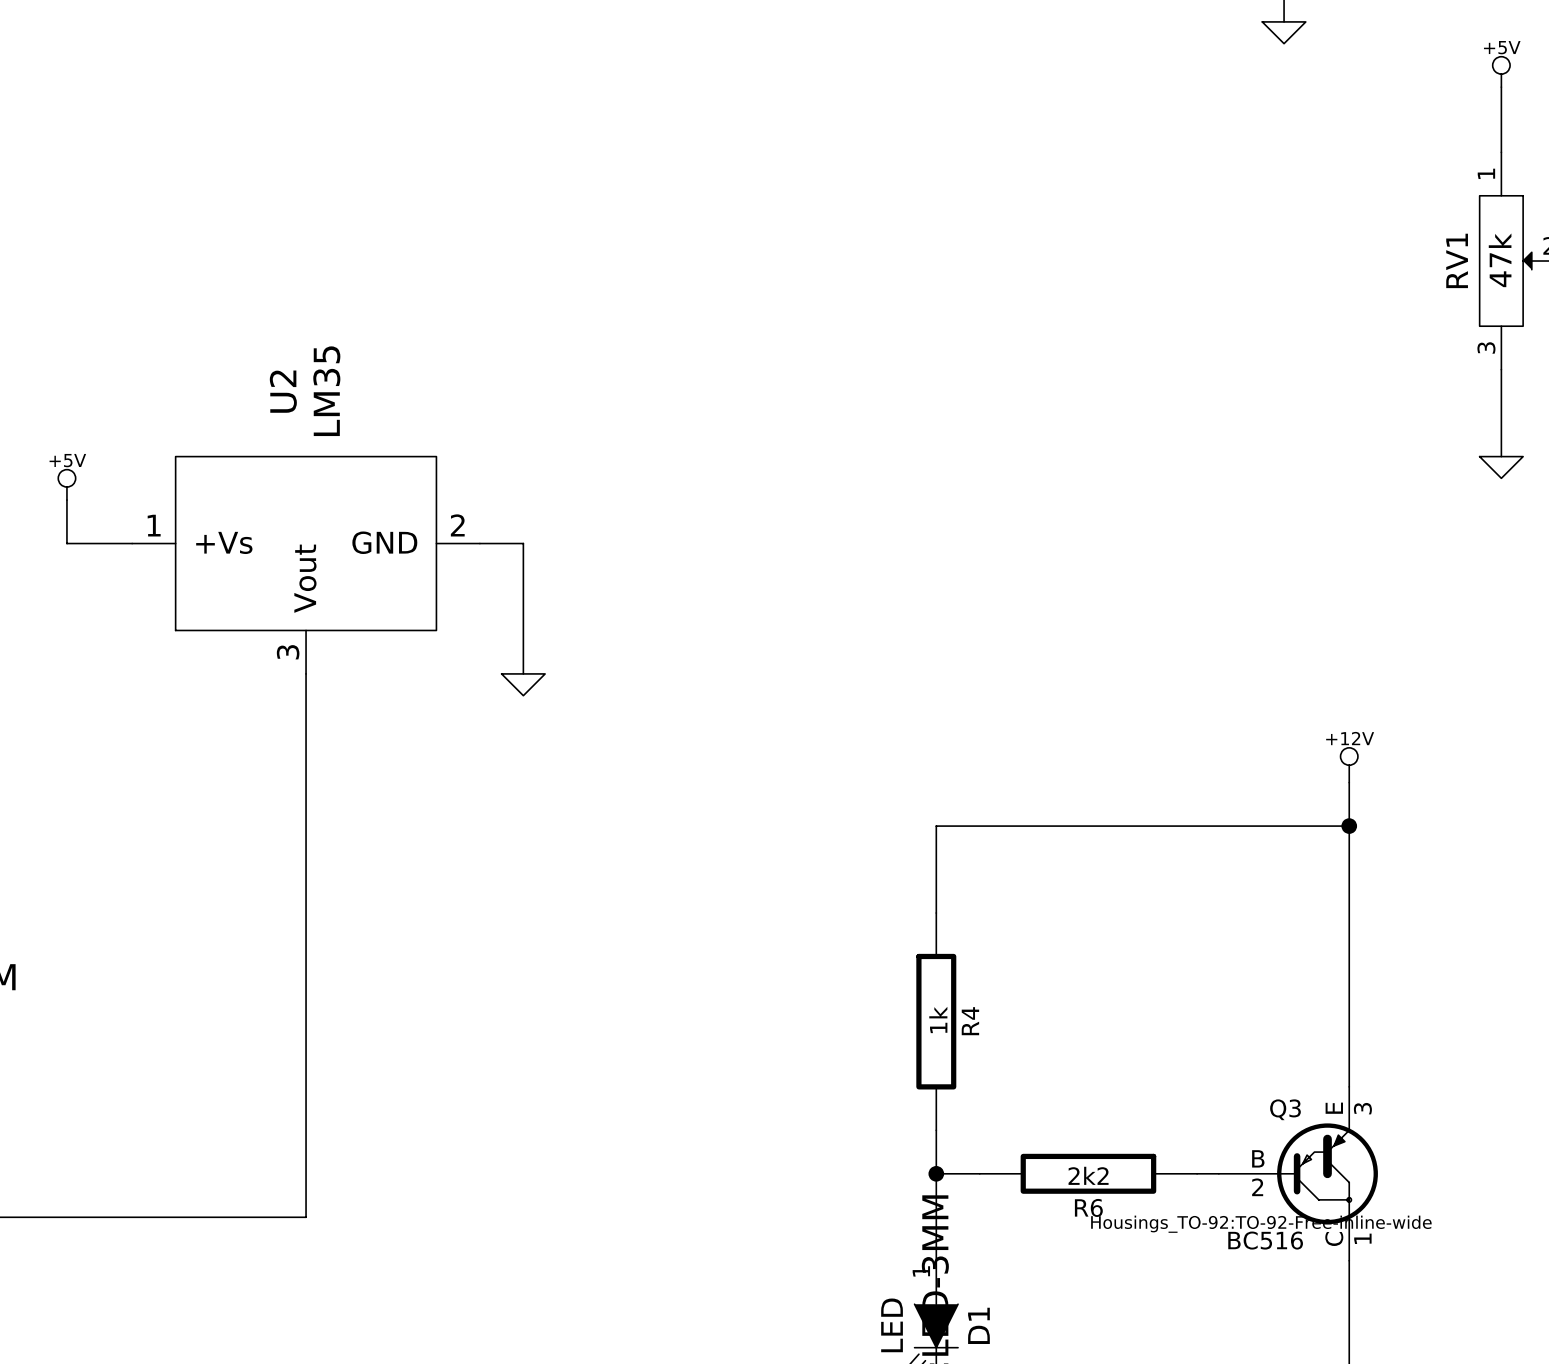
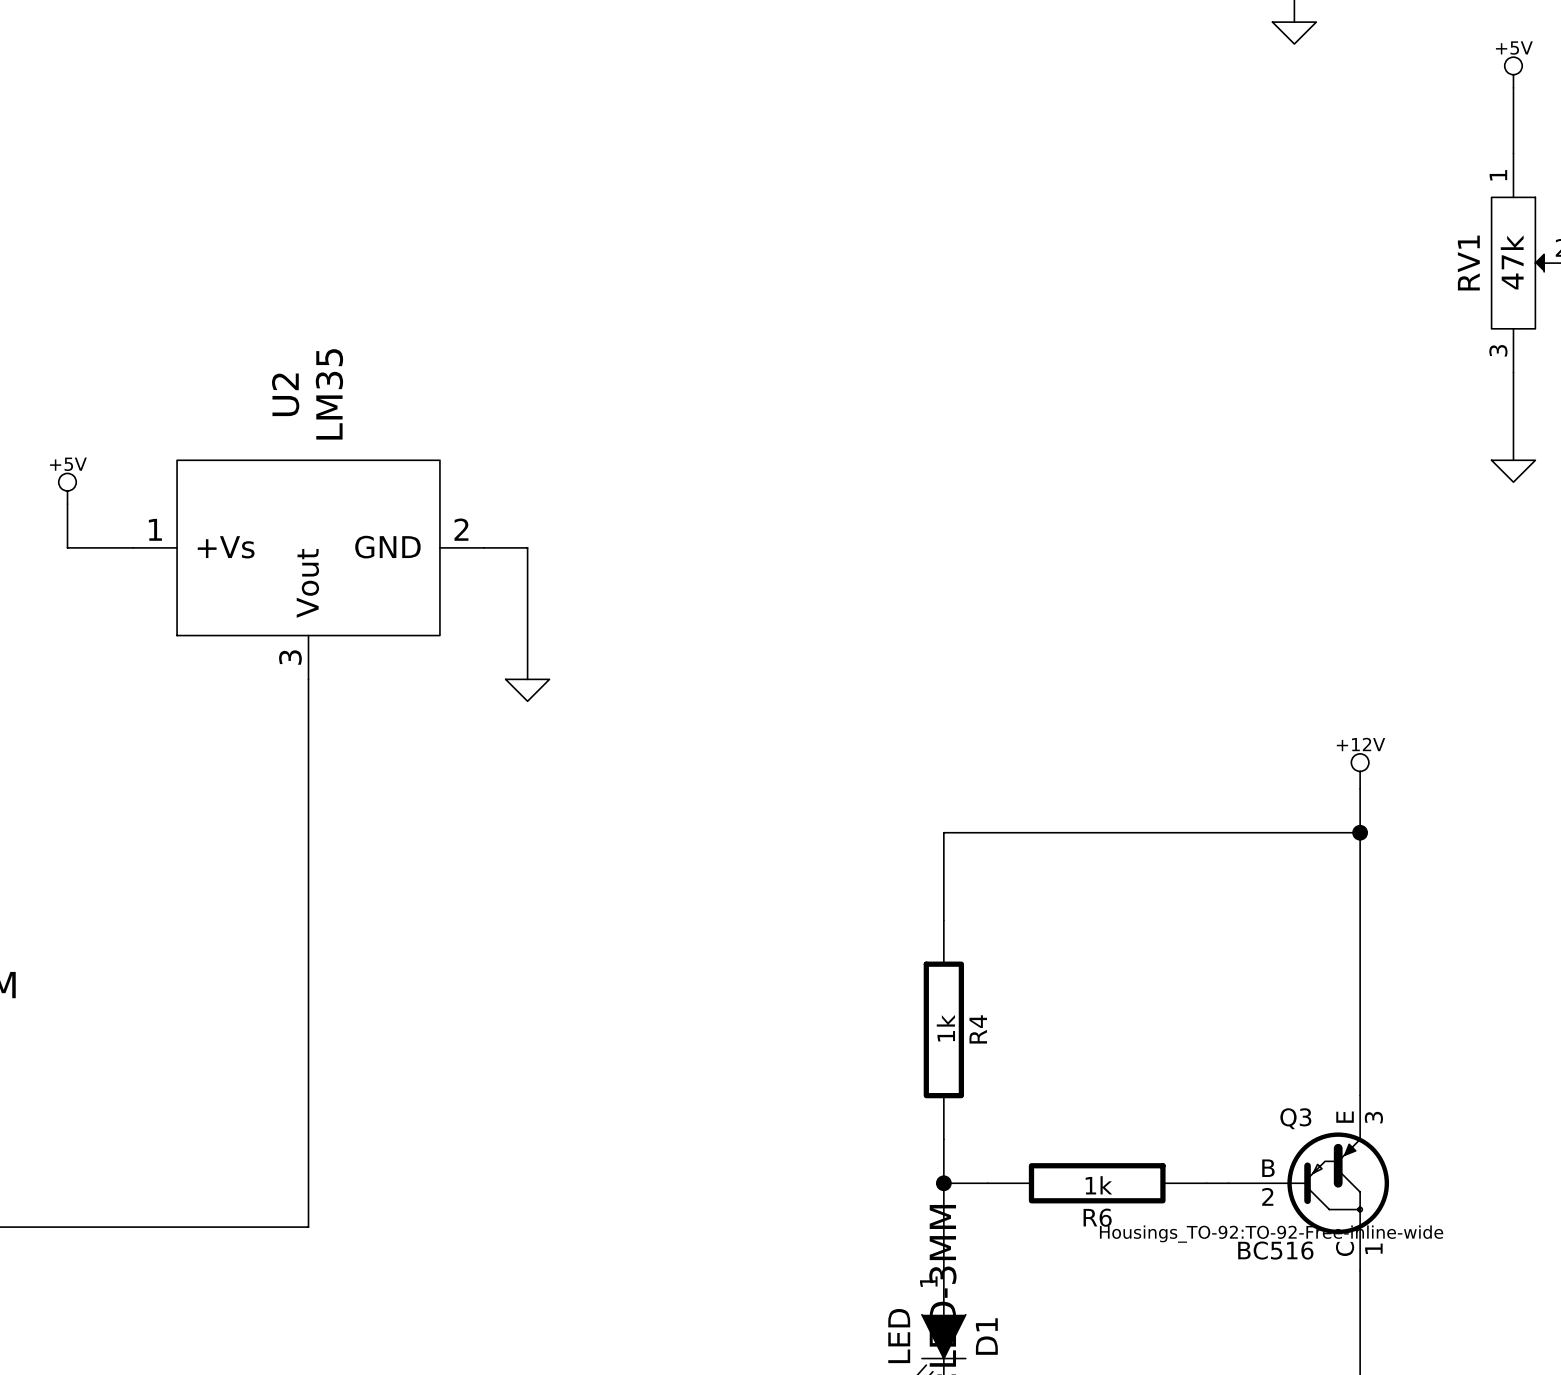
R6 value: 2k2 (1088, 1175) -> 1k (1098, 1185)

